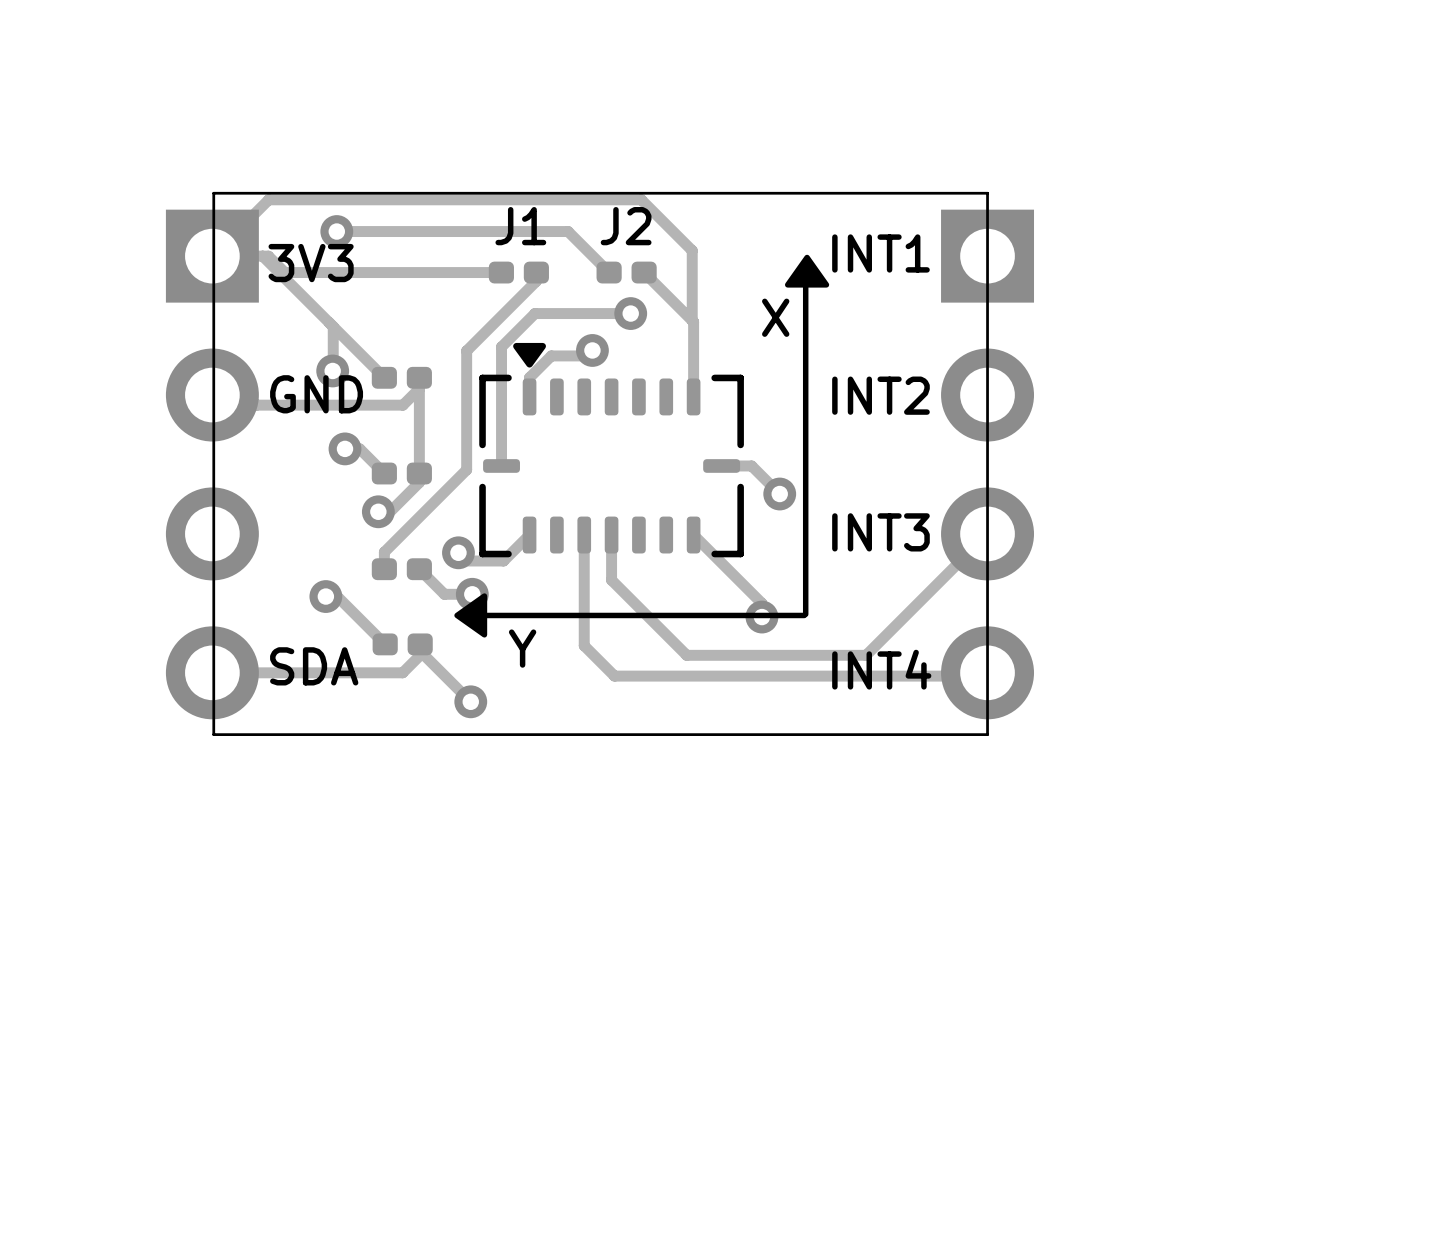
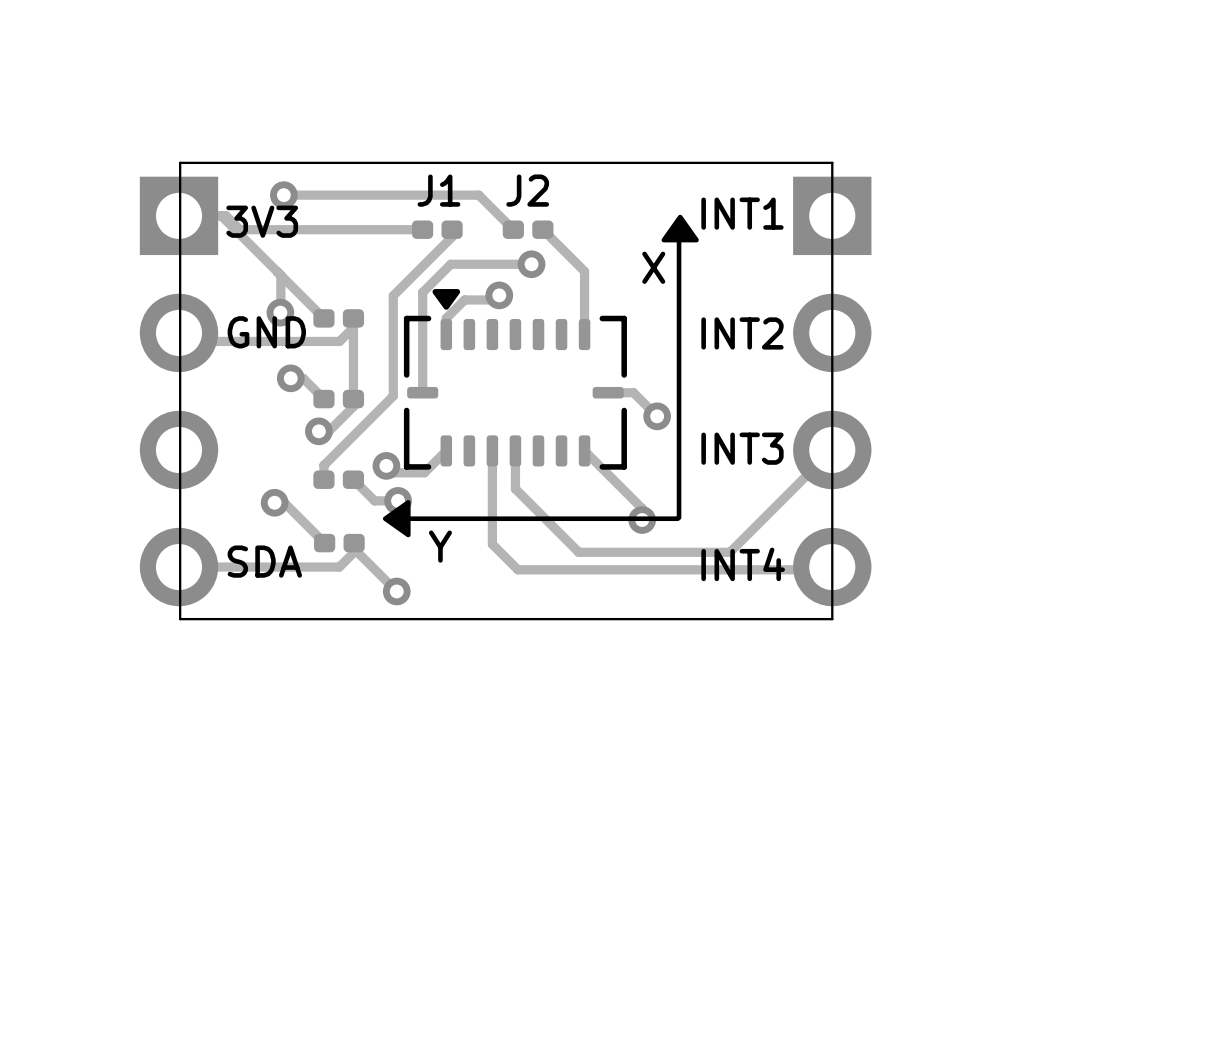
track: (212, 256) (268, 199) (641, 199) (692, 250) (692, 320) -> none

